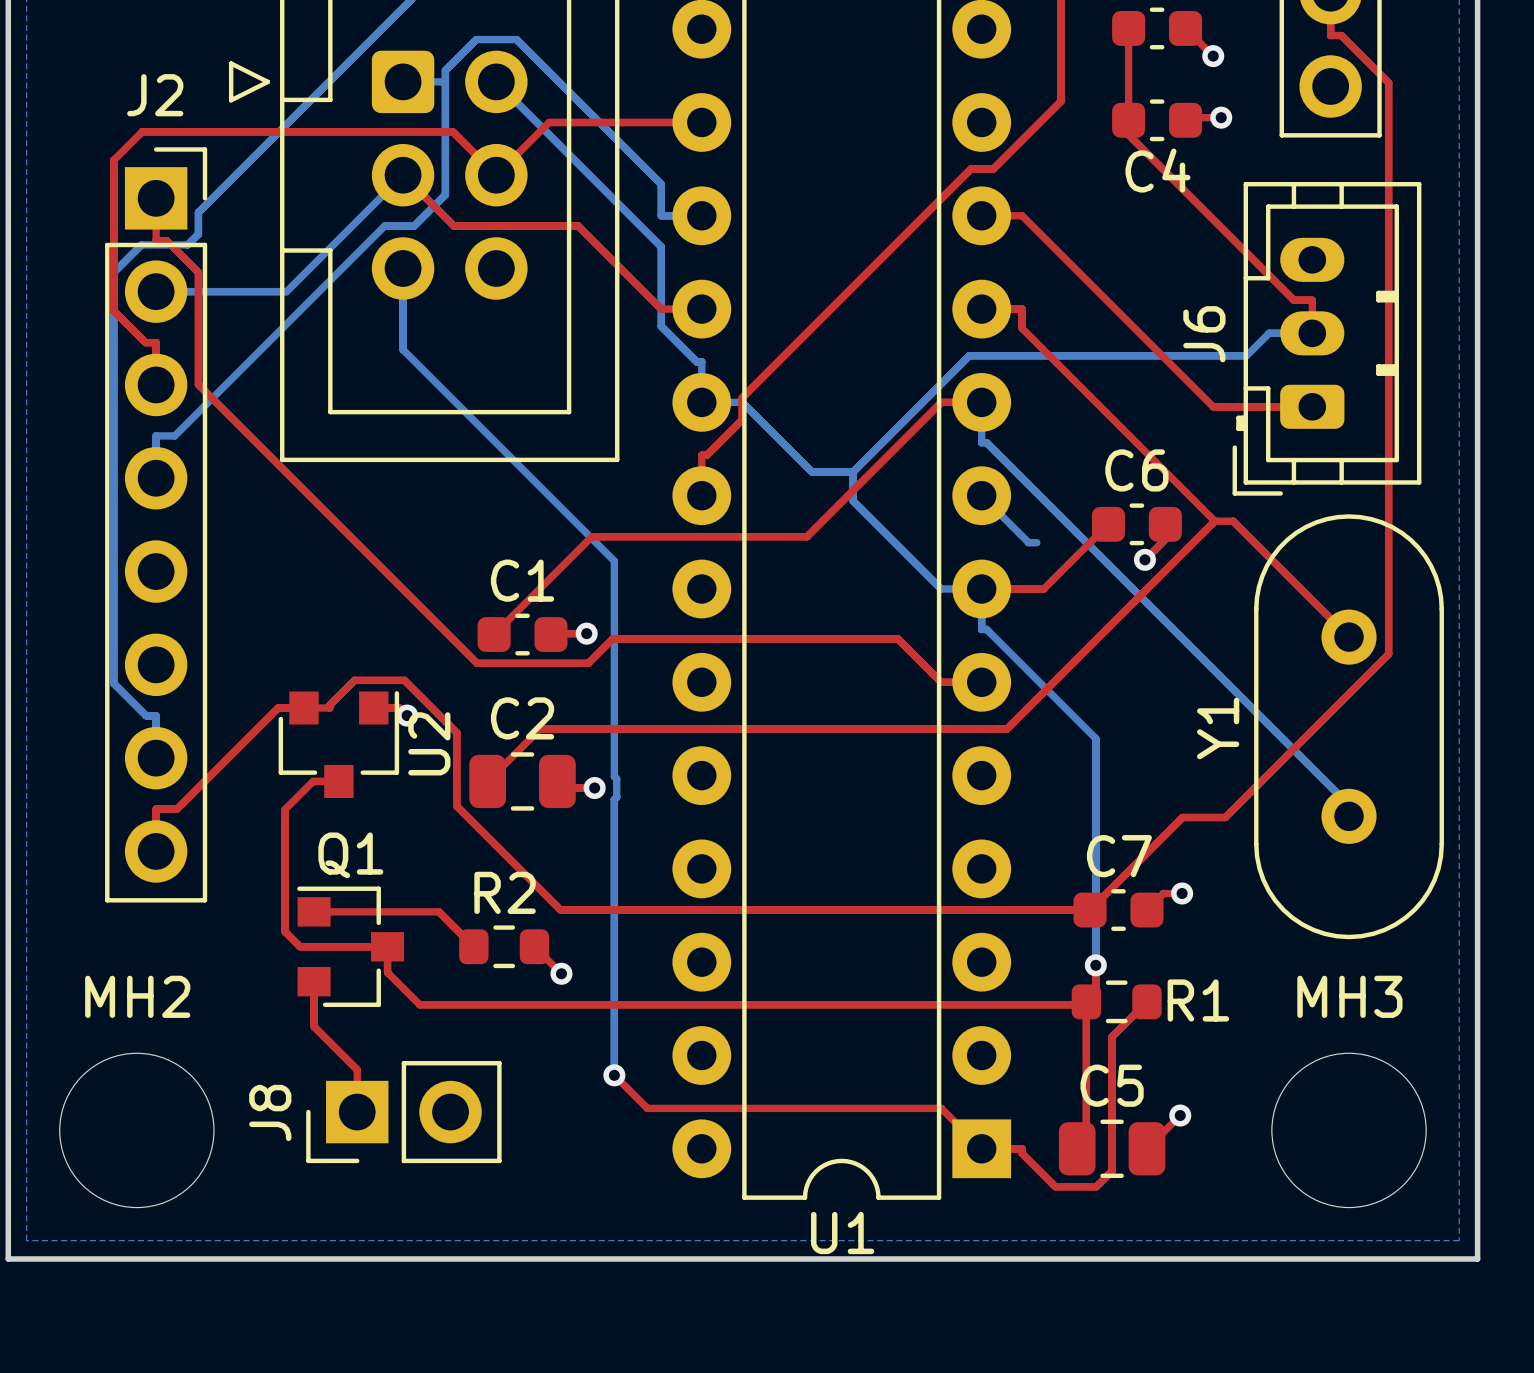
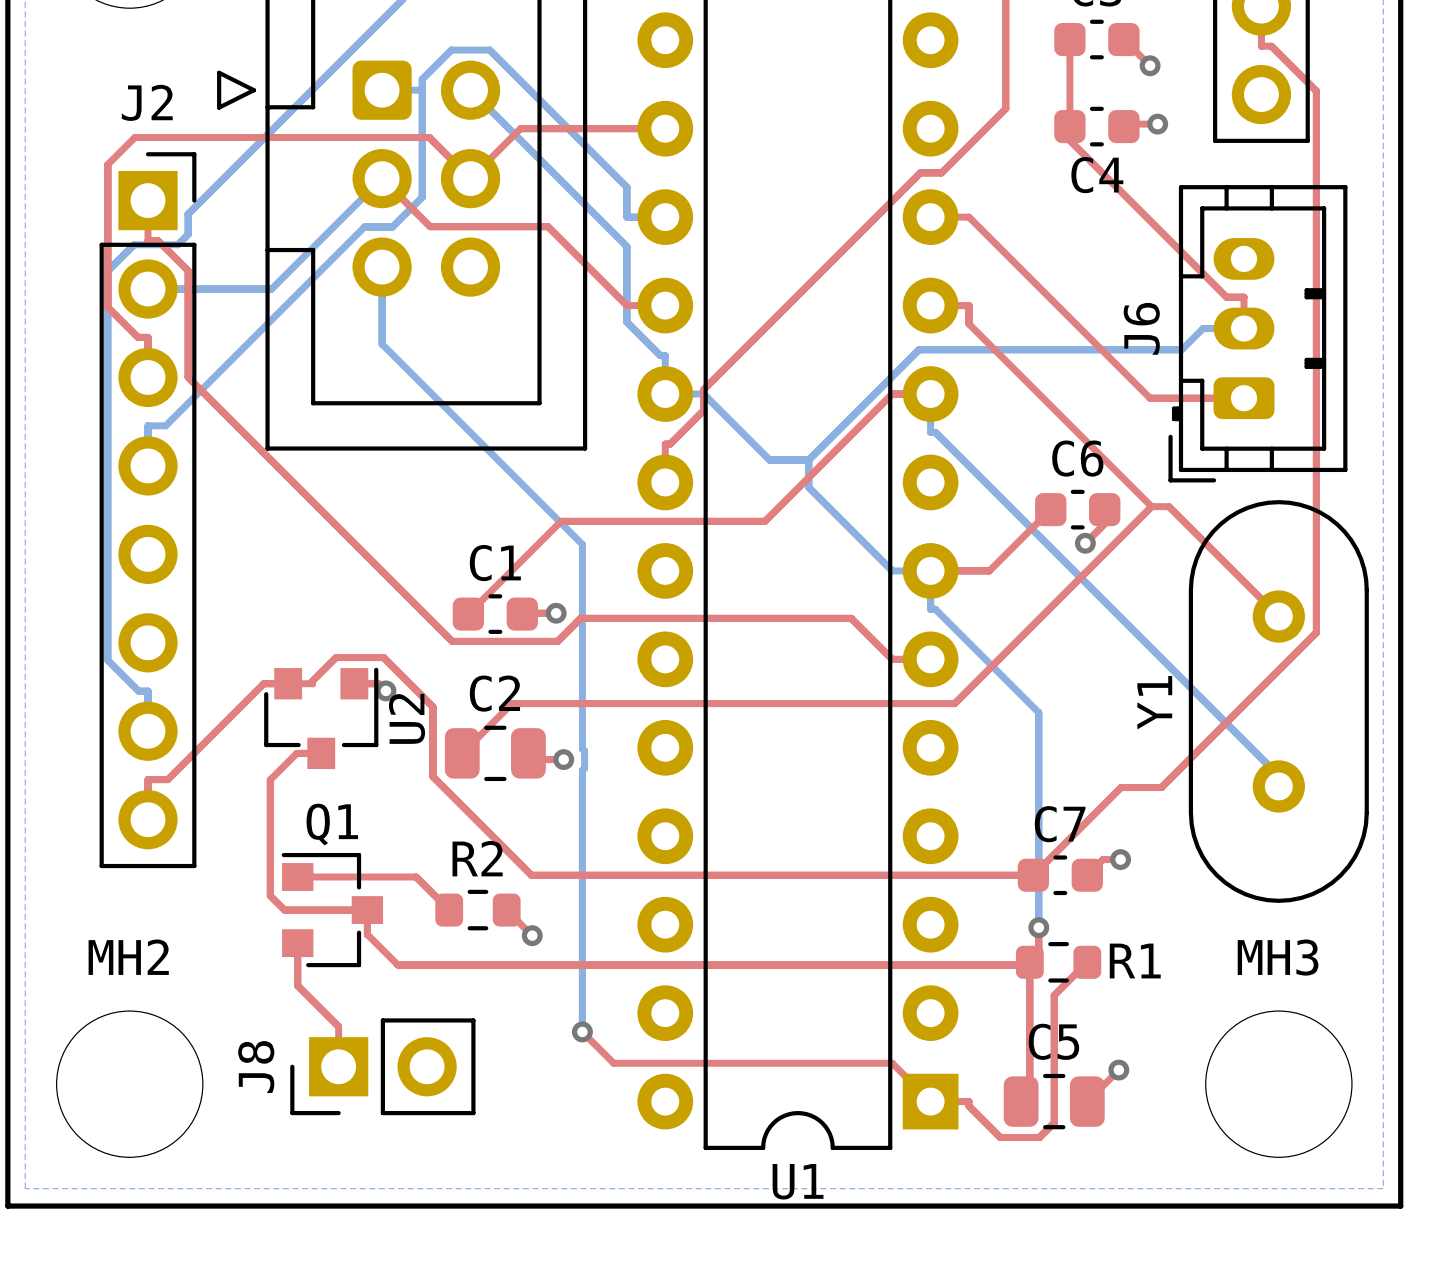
bottom track: (981, 495) (1028, 542) (1036, 542) -> none

